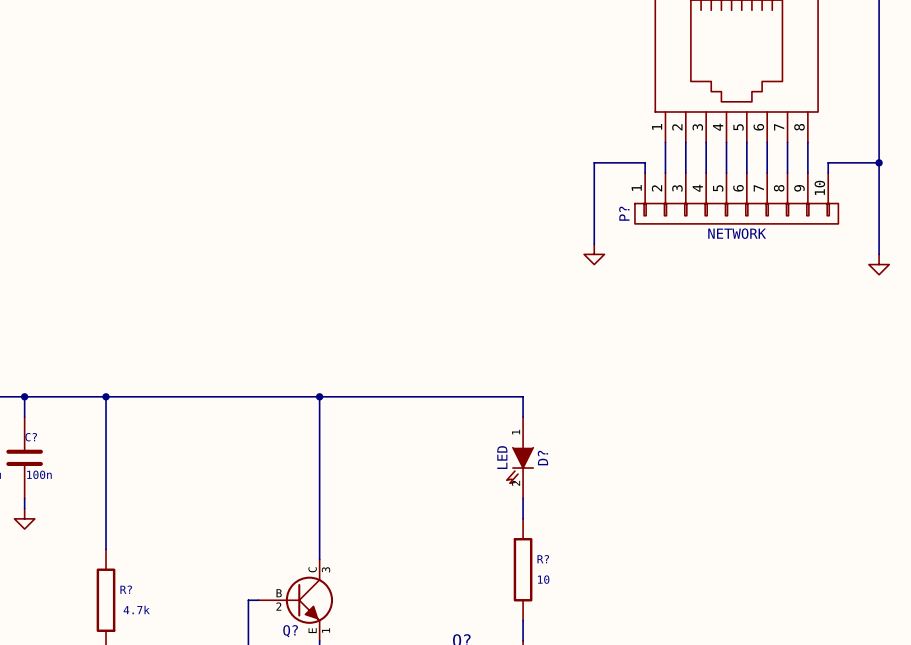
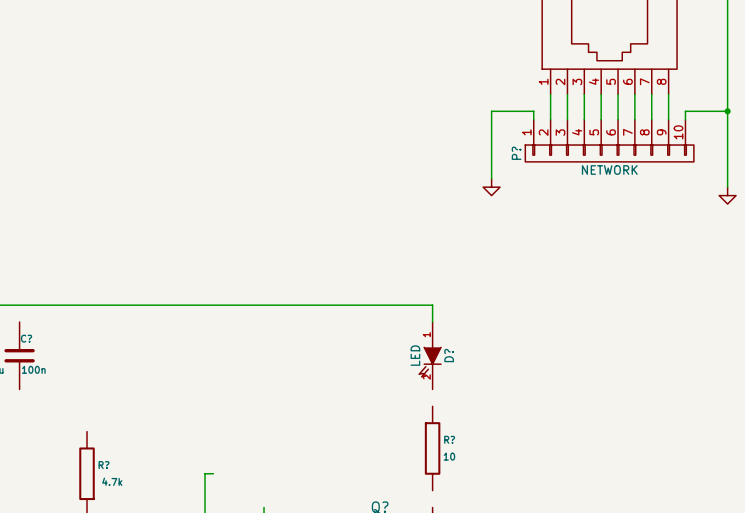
wire: (24, 396) (24, 417) -> none
junction: (24, 396) -> none
wire: (106, 396) (106, 549) -> none
junction: (106, 396) -> none
wire: (319, 396) (319, 559) -> none
junction: (319, 396) -> none
wire: (24, 498) (24, 508) -> none
wire: (523, 498) (523, 518) -> none
power symbol: (24, 518) -> none
Q?: (295, 600) -> none
wire: (523, 620) (523, 640) -> none

